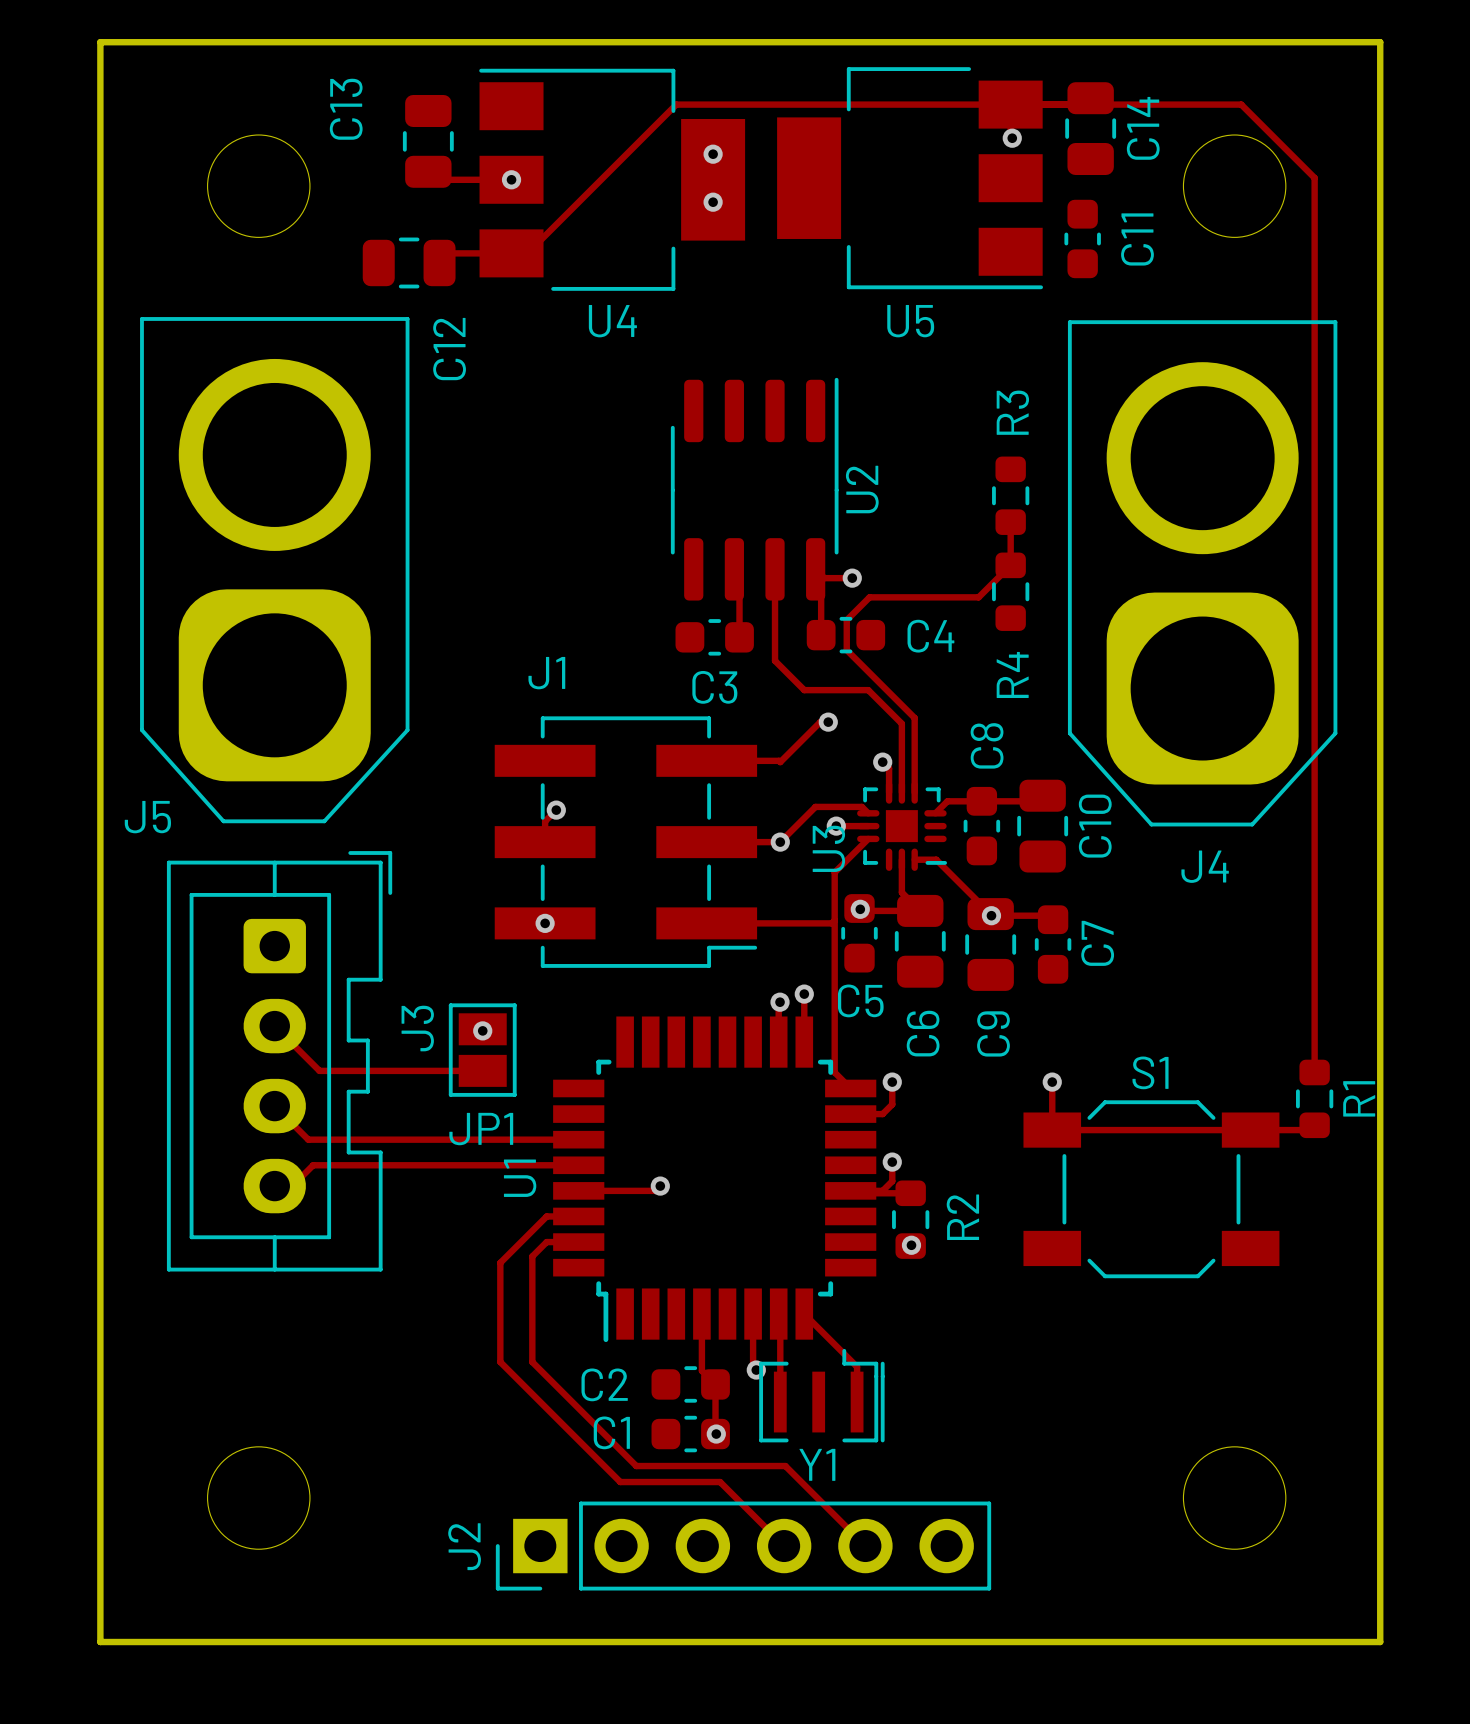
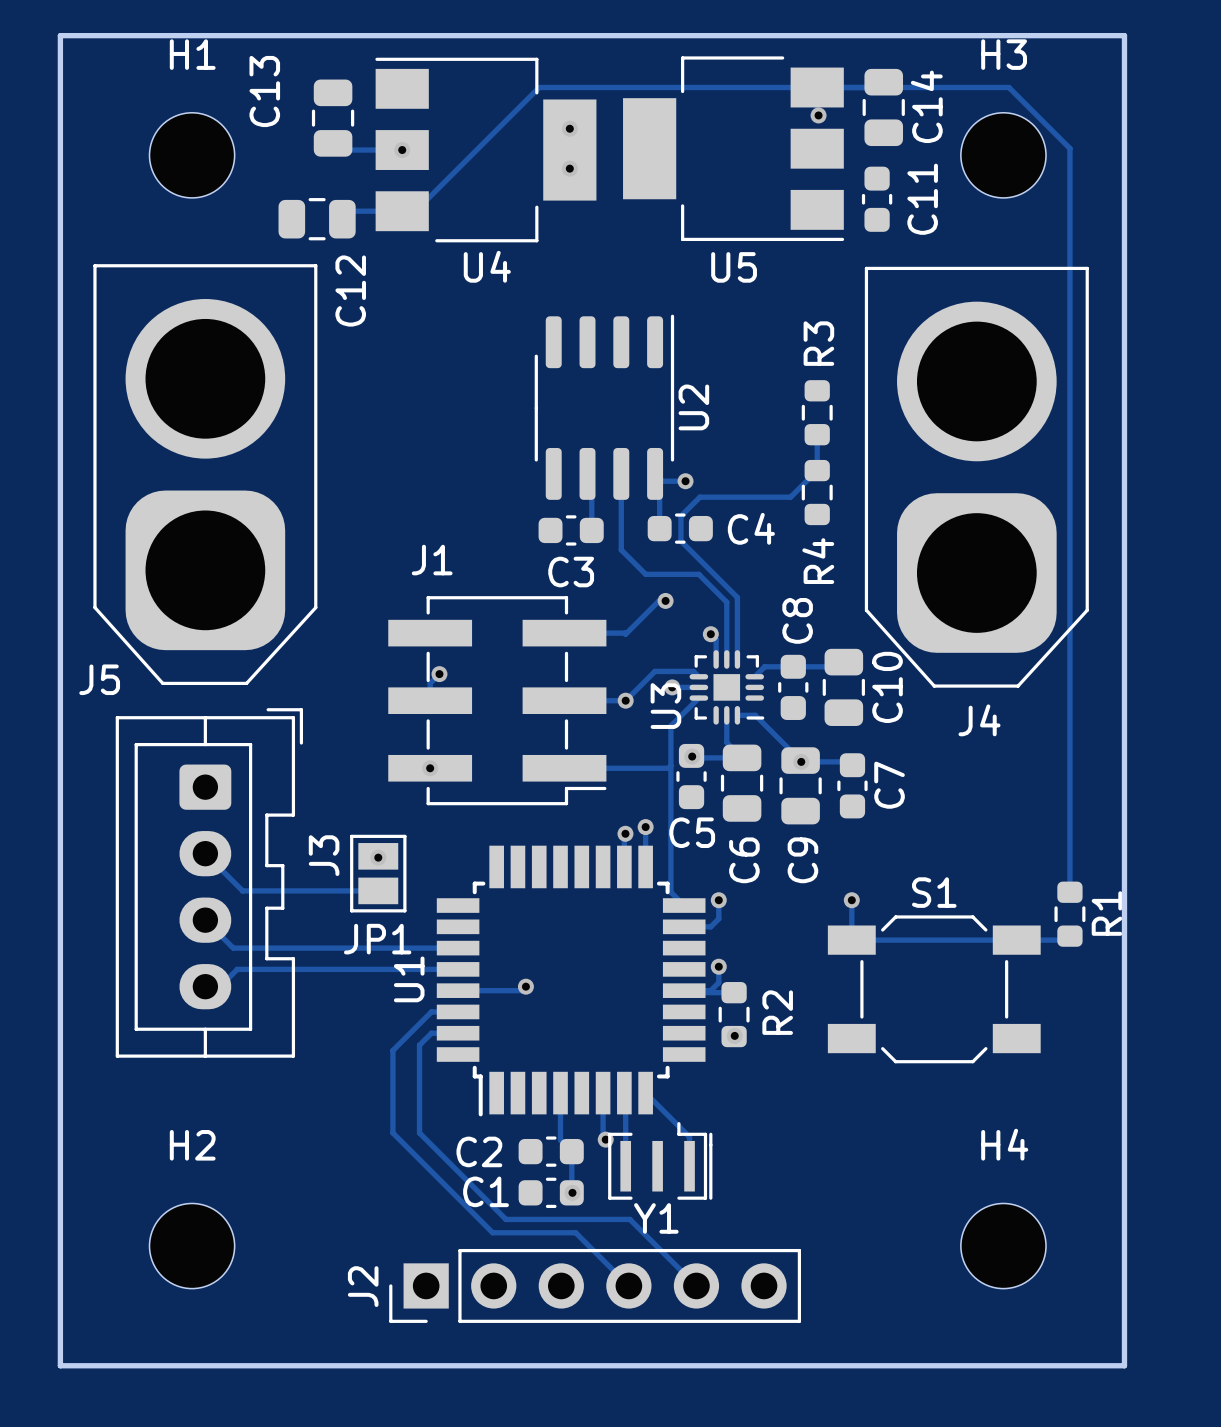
H1 name: none -> H1 (192, 54)
H3 name: none -> H3 (1004, 54)
H2 name: none -> H2 (192, 1145)
H4 name: none -> H4 (1004, 1144)

